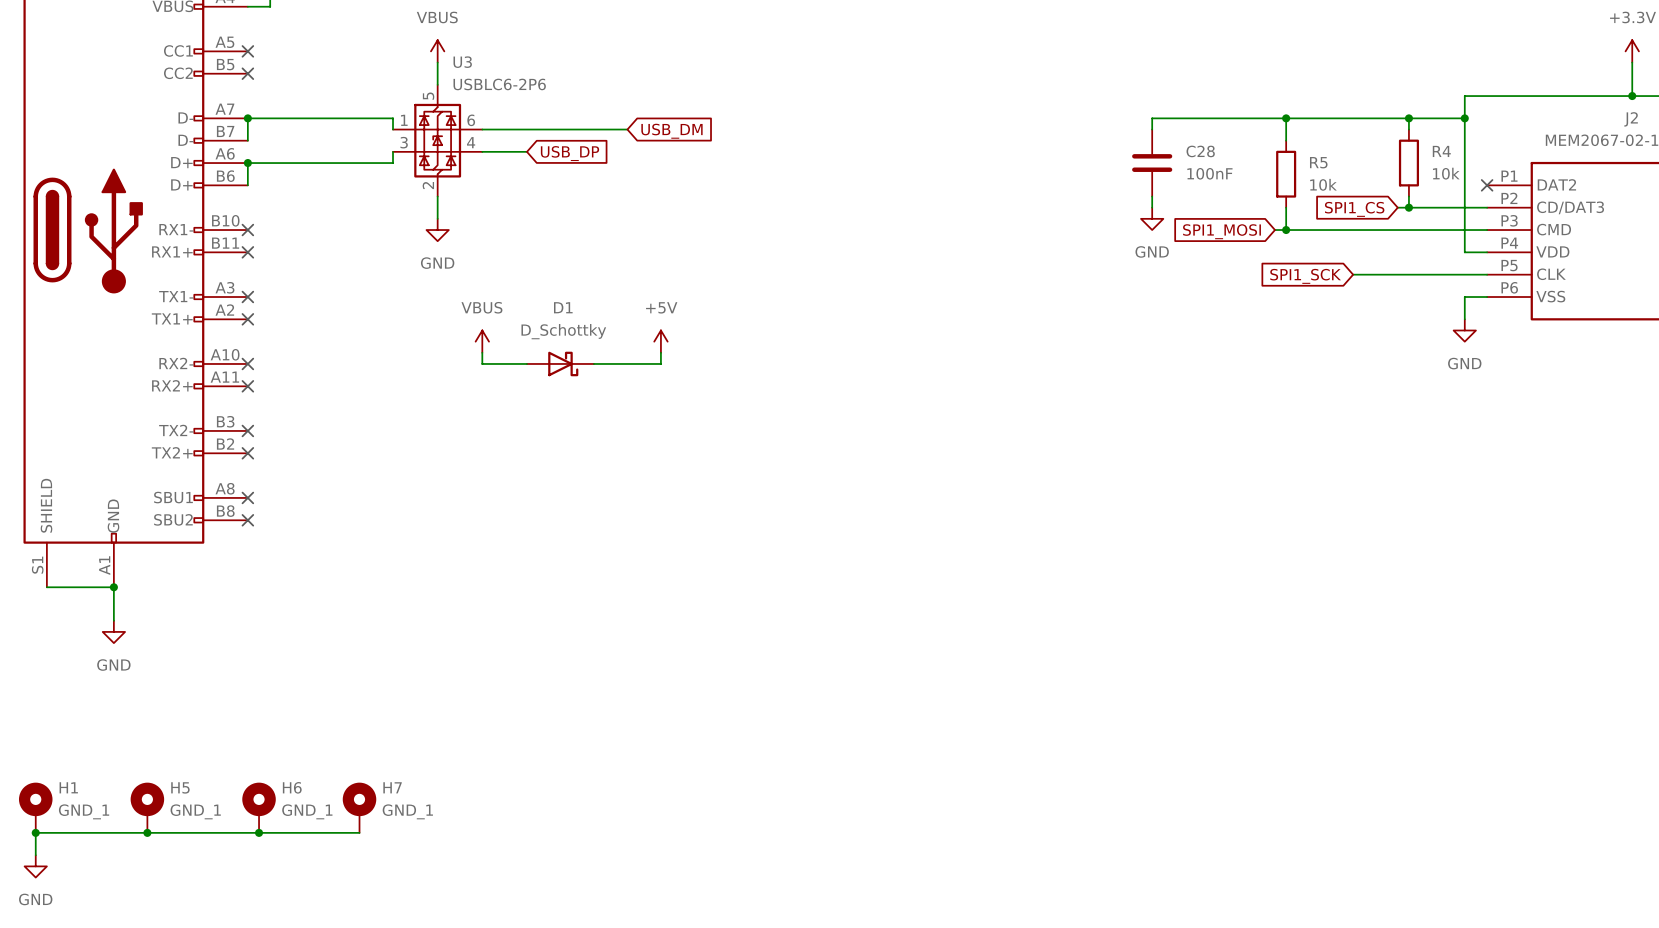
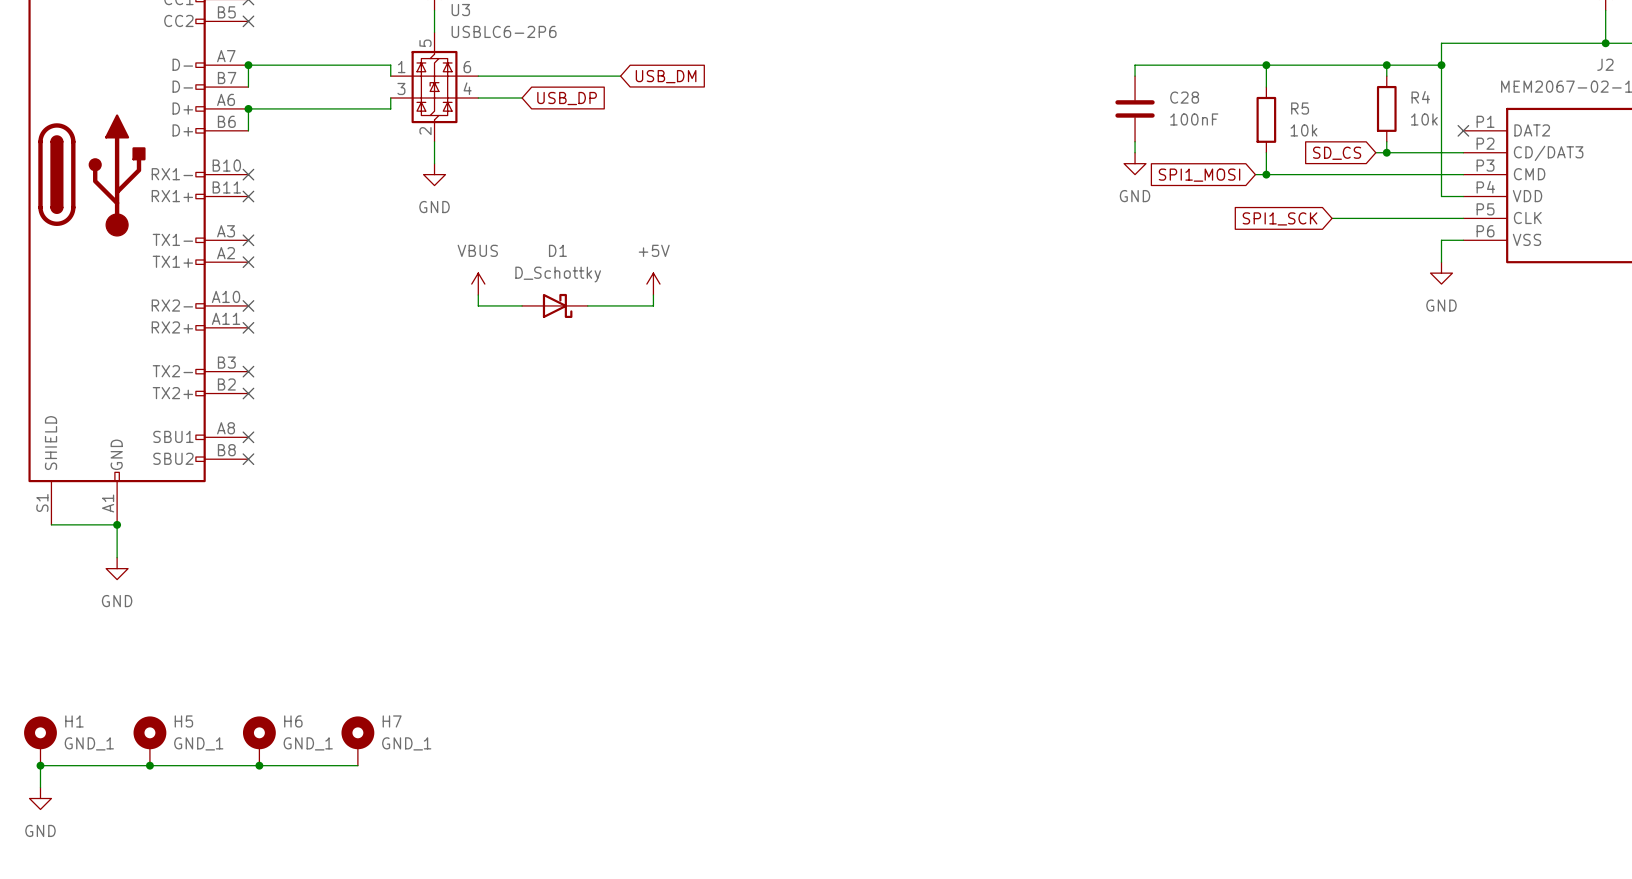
global label: SPI1_CS (1354, 209) -> SD_CS (1337, 153)

